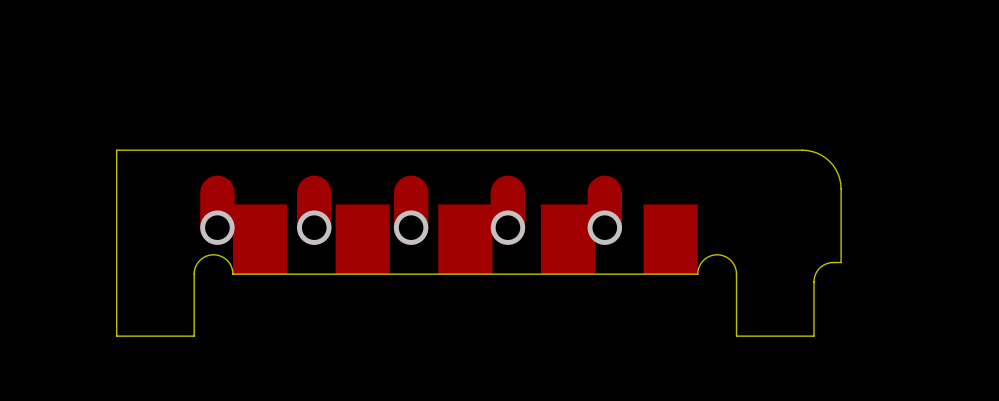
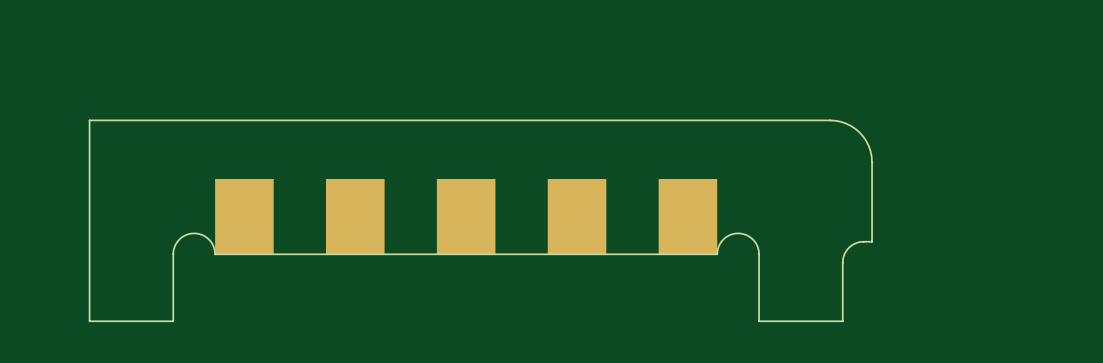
track: (217, 192) (217, 227) -> none
track: (314, 192) (314, 227) -> none
track: (411, 192) (411, 227) -> none
track: (507, 192) (507, 227) -> none
track: (604, 192) (604, 227) -> none
via: (217, 227) -> none
via: (314, 227) -> none
via: (411, 227) -> none
via: (507, 227) -> none
via: (604, 227) -> none

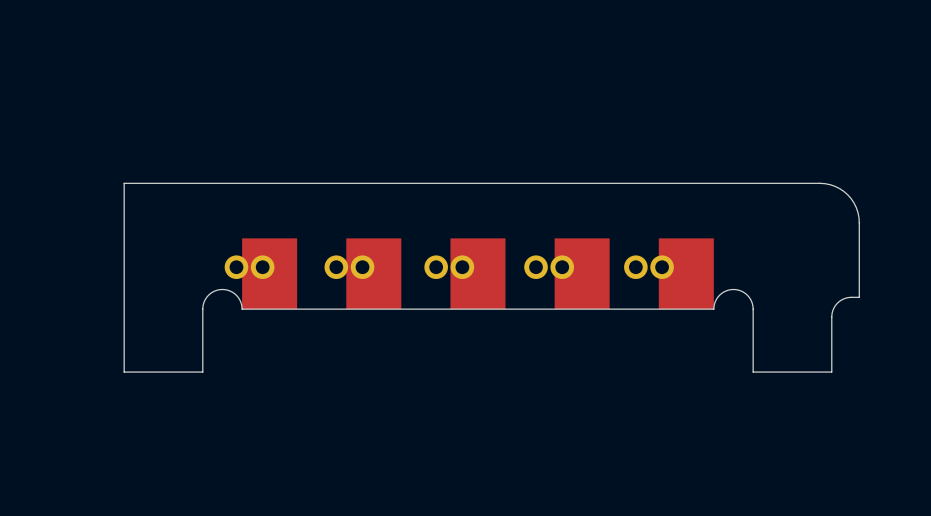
part: none -> (236, 267)
part: none -> (262, 267)
part: none -> (336, 267)
part: none -> (362, 267)
part: none -> (436, 267)
part: none -> (462, 267)
part: none -> (536, 267)
part: none -> (562, 267)
part: none -> (635, 267)
part: none -> (662, 267)

